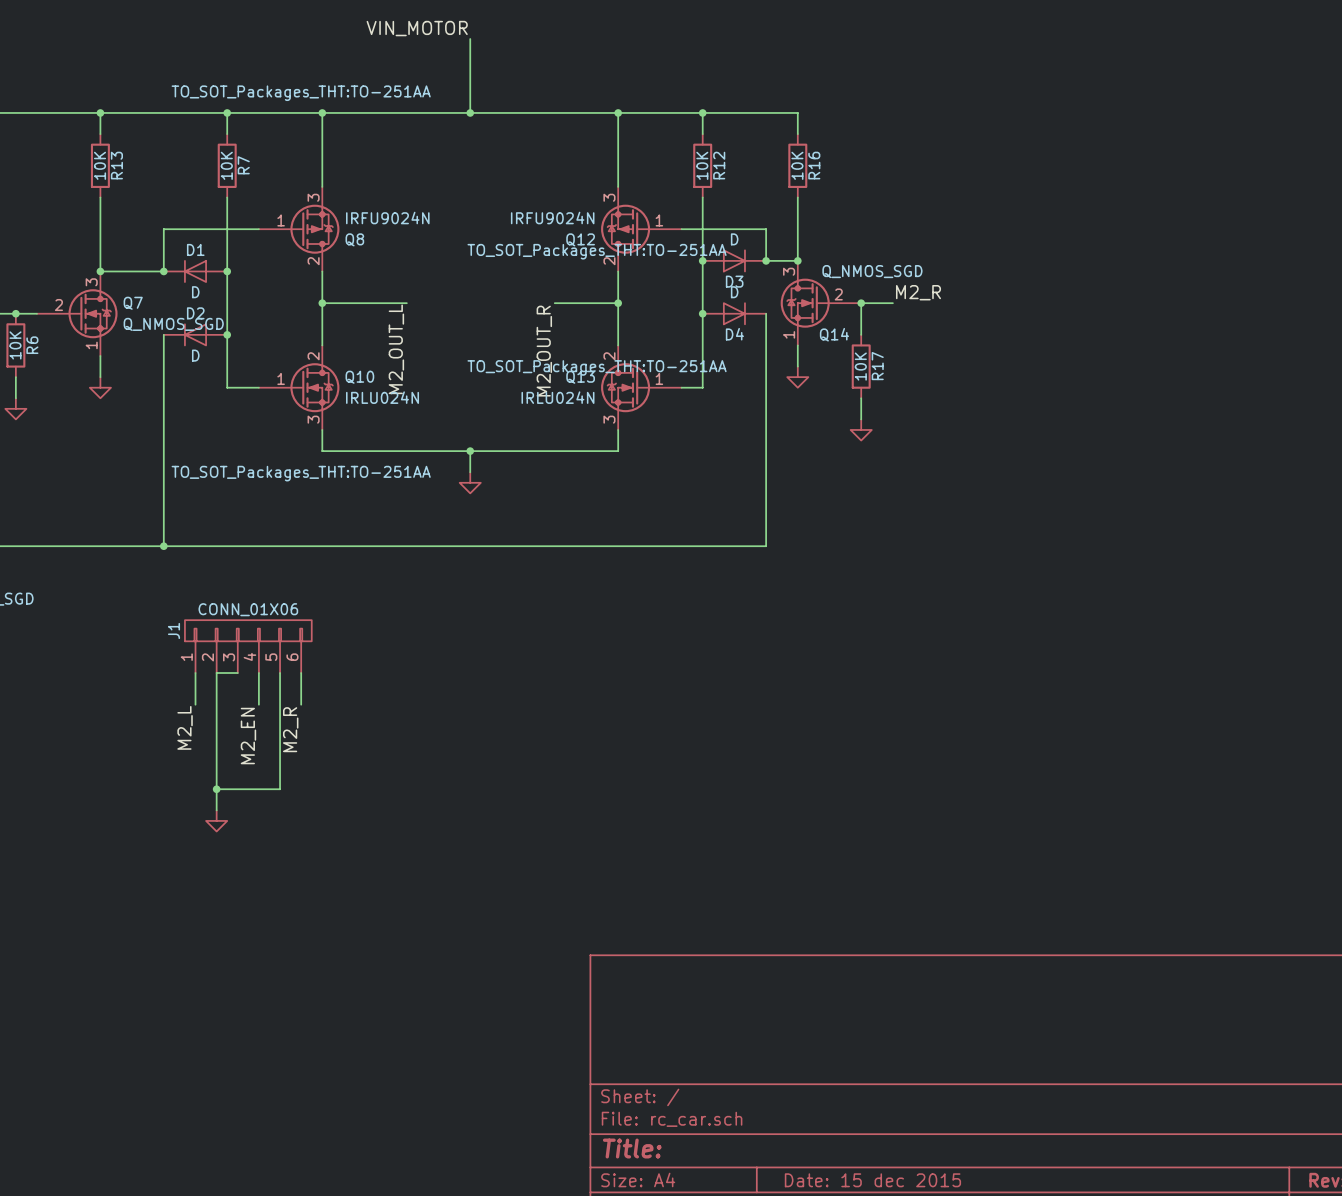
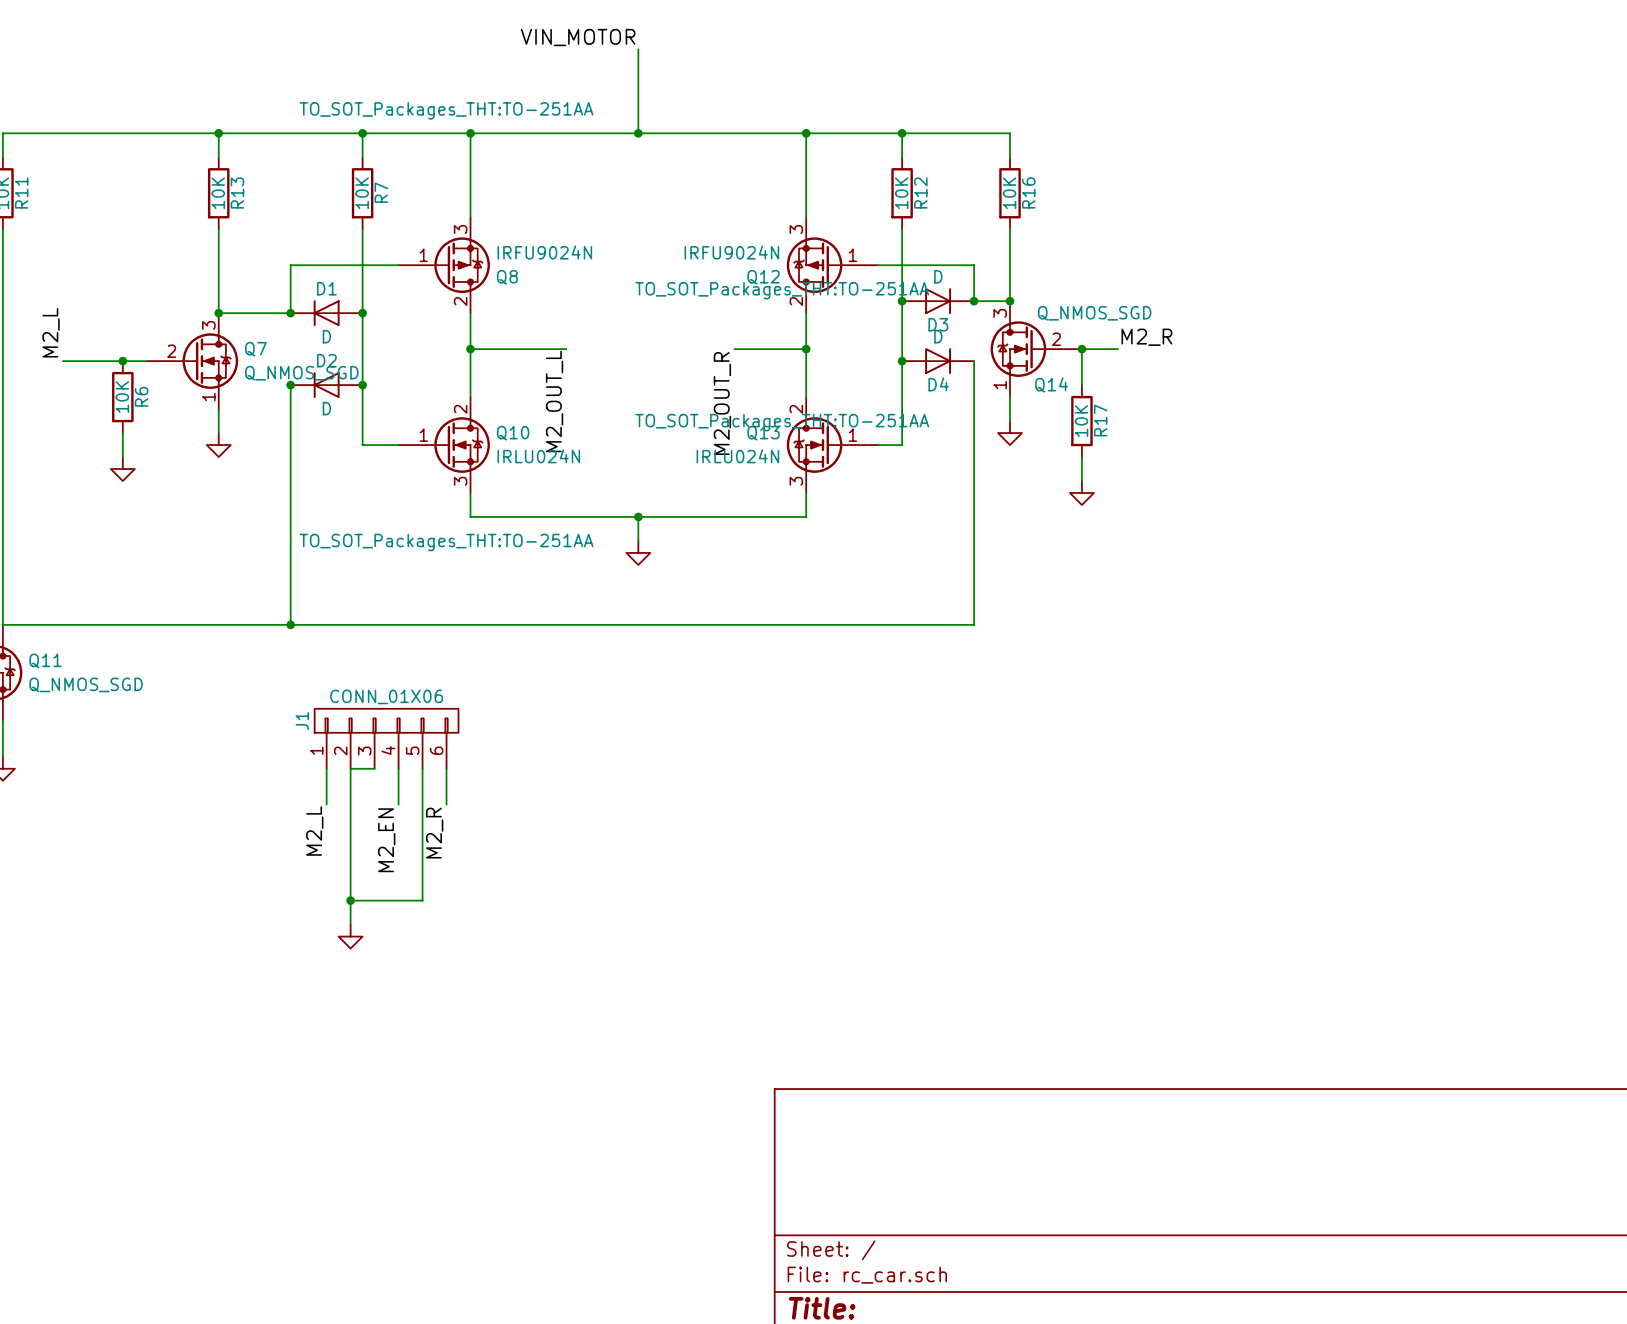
junction: none -> (290, 385)

